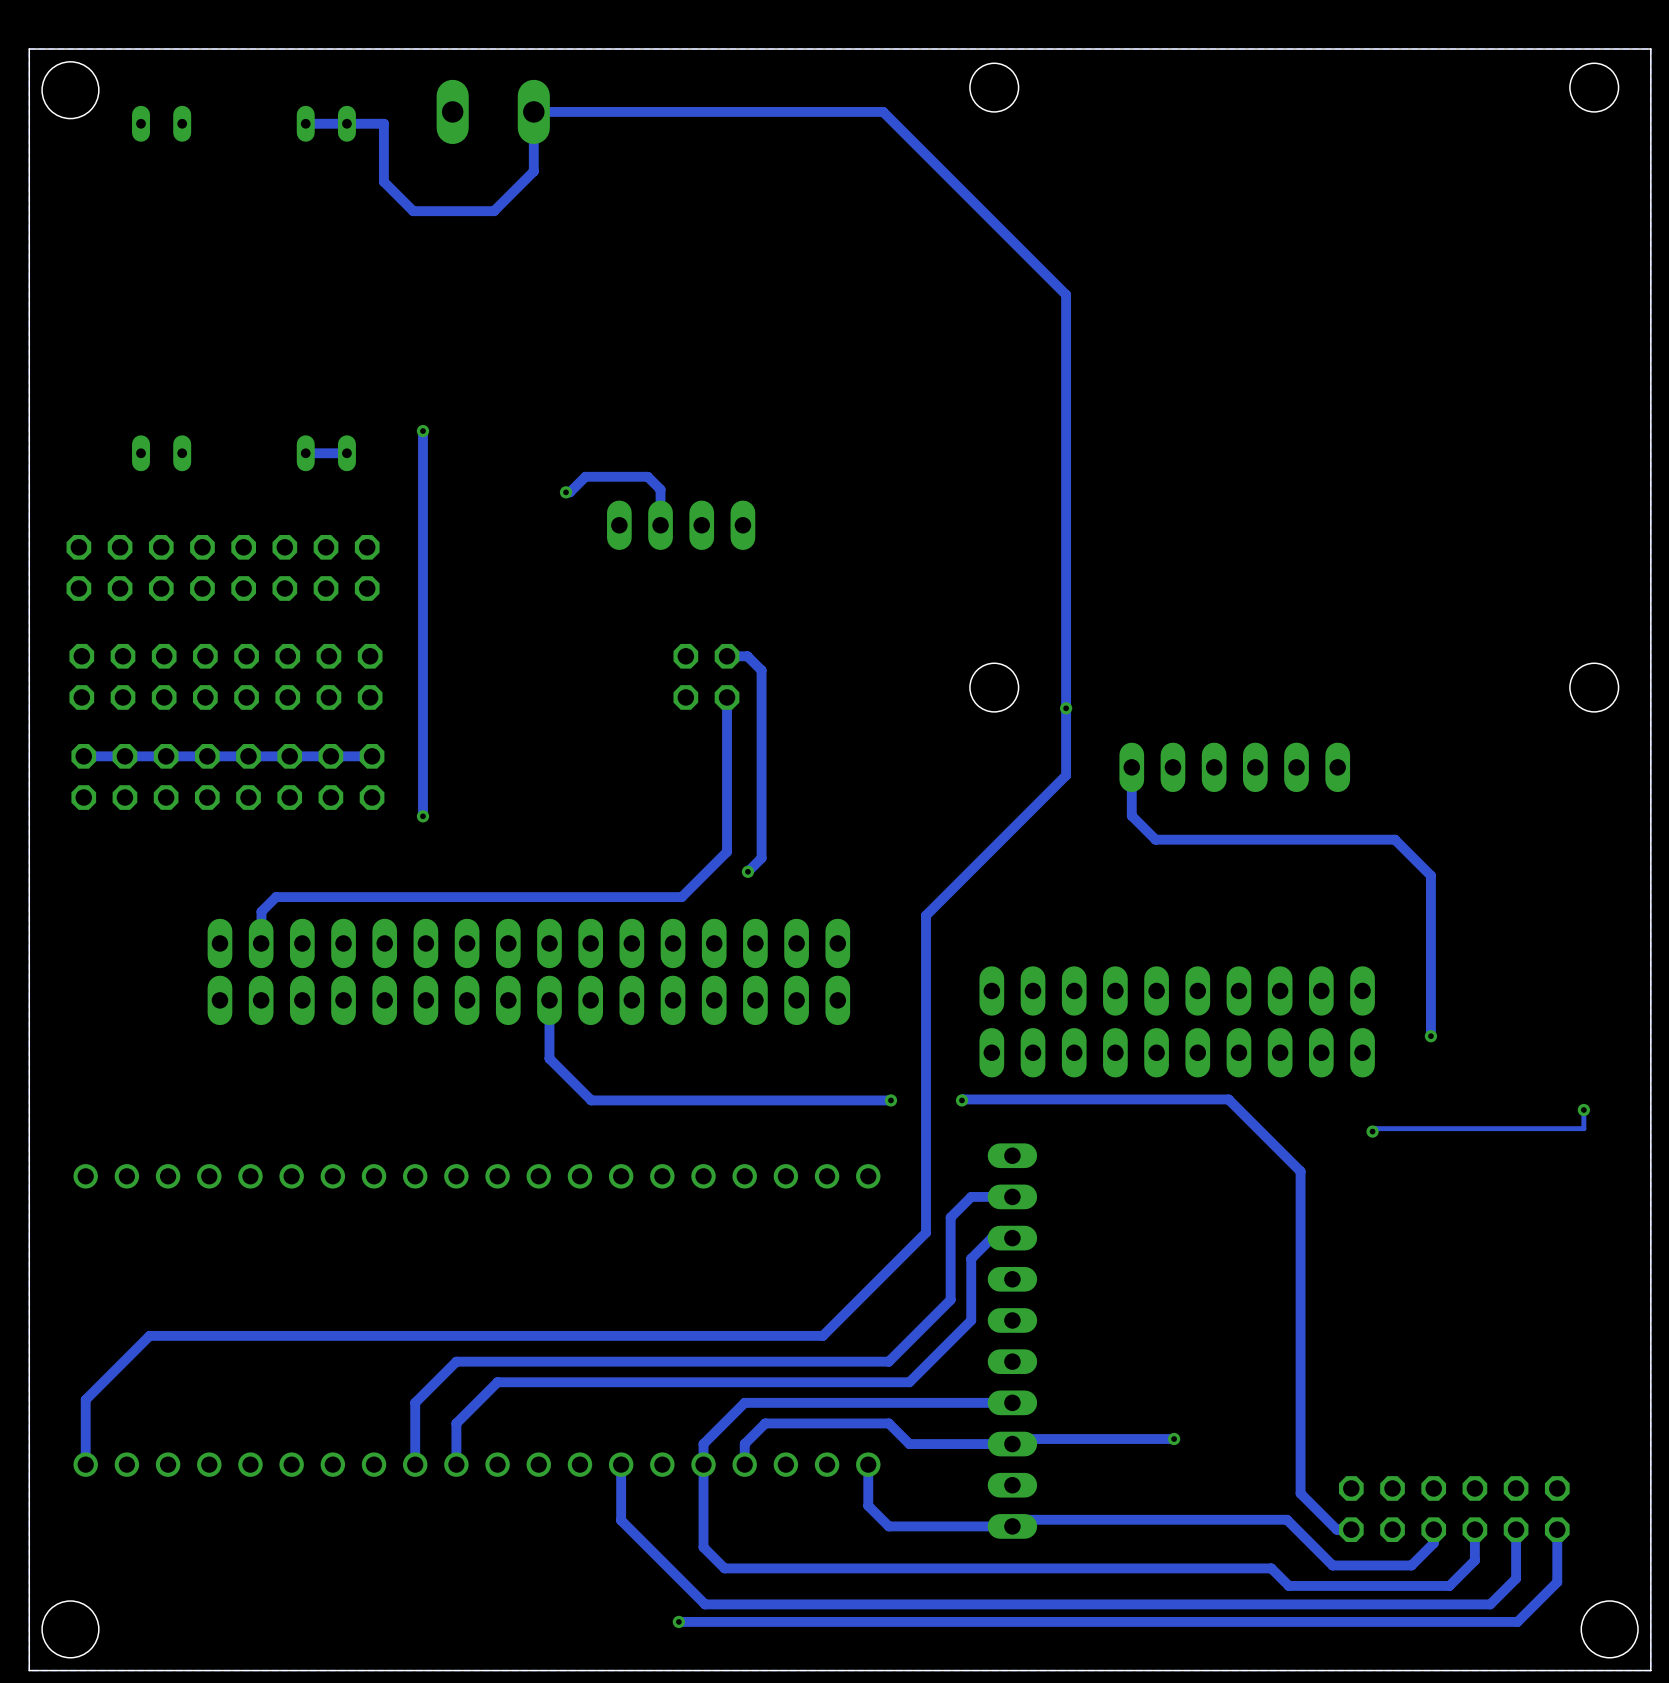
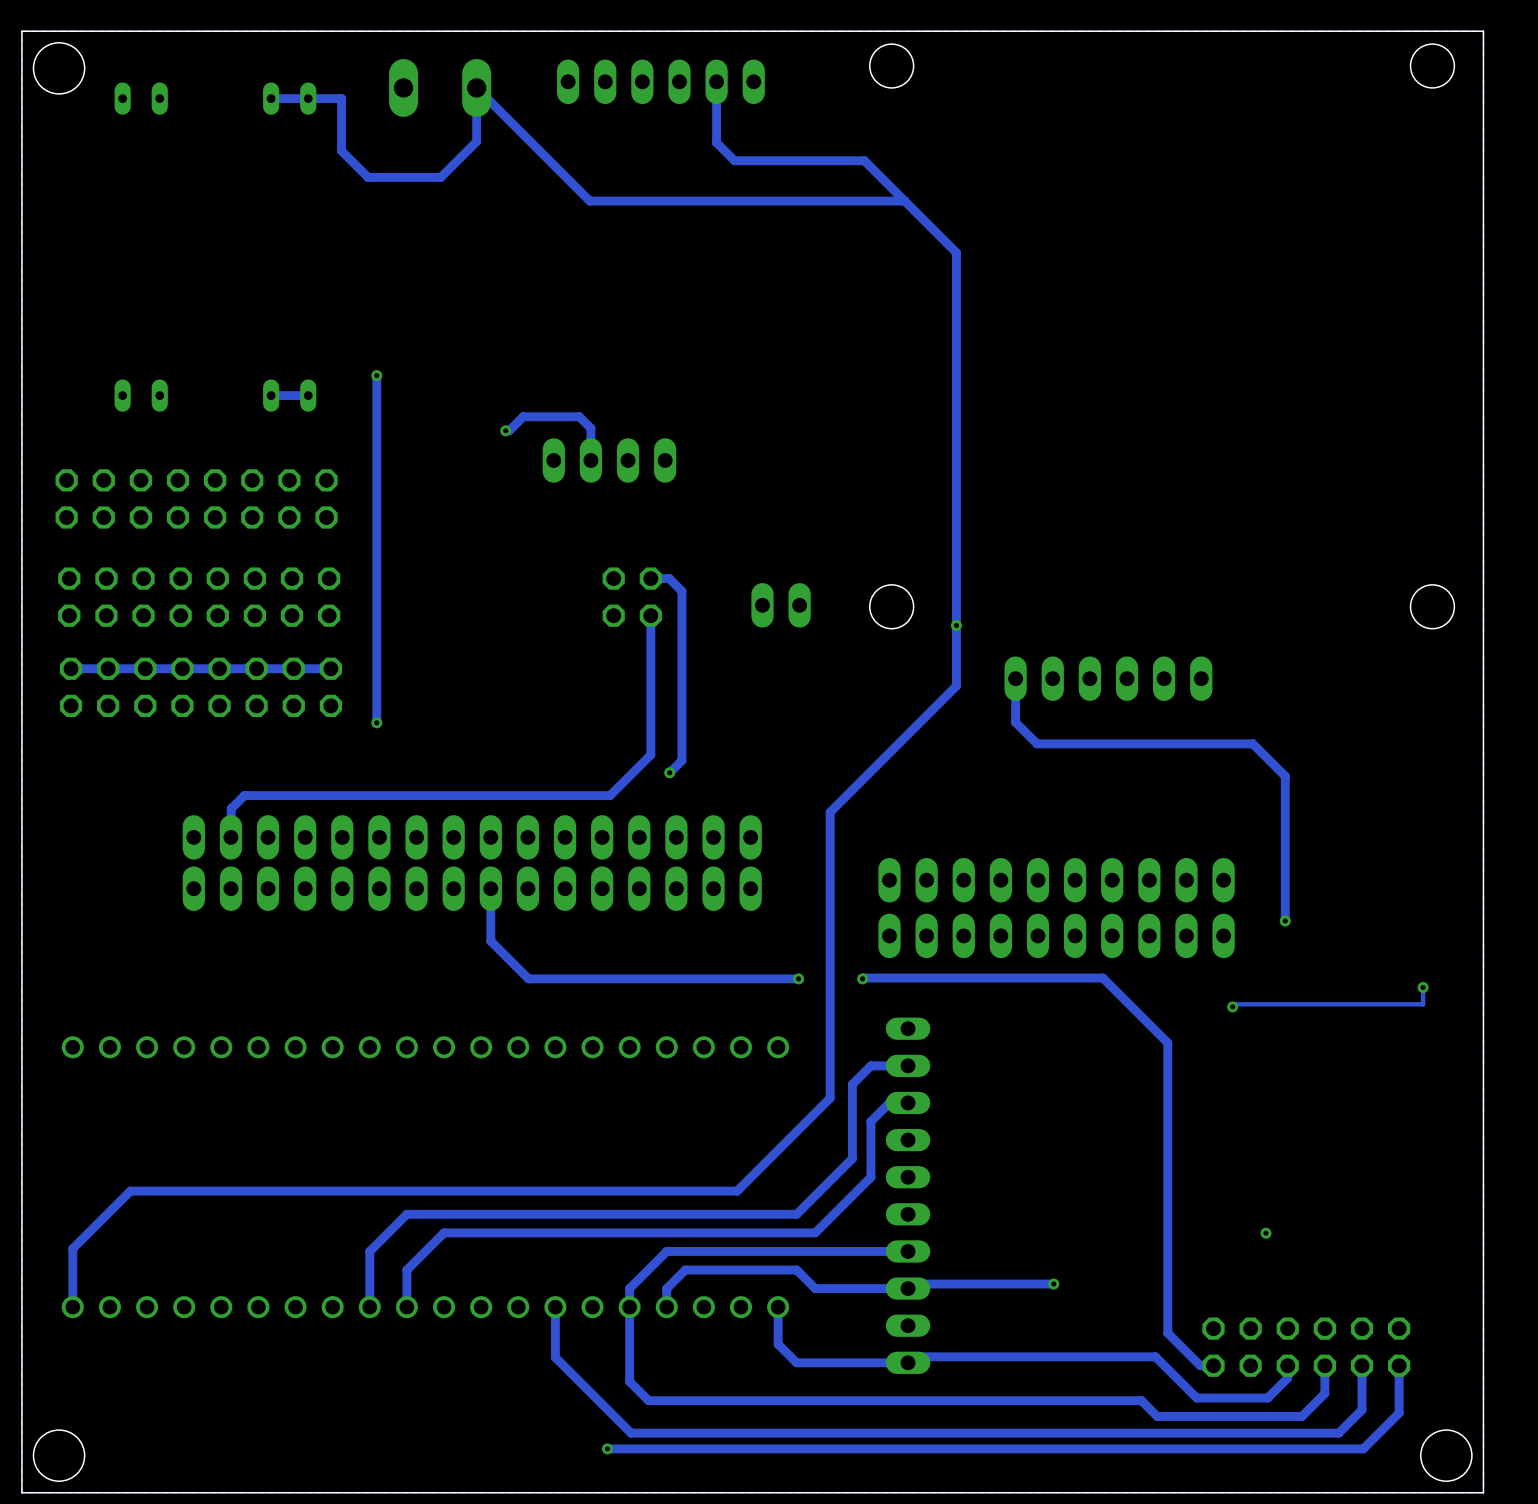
part: none -> (660, 81)
track: none -> (716, 81) (716, 142) (734, 160) (864, 160)
track: (533, 111) (883, 111) (963, 192) -> (476, 87) (589, 201) (904, 201)
part: none -> (781, 605)
via: none -> (1265, 1233)

